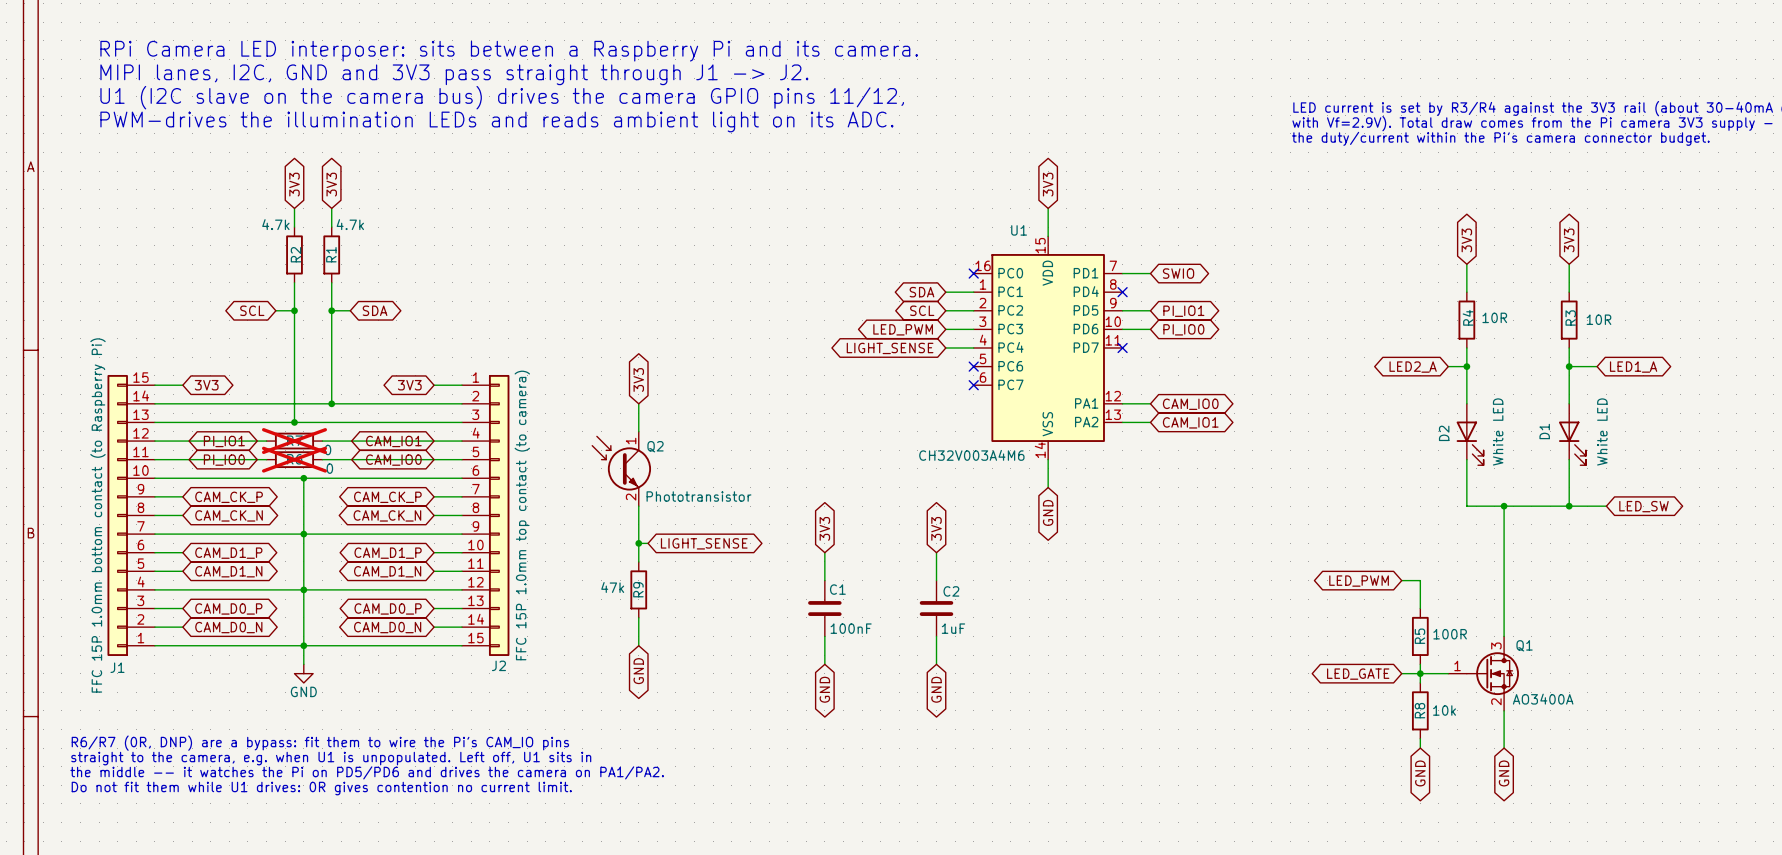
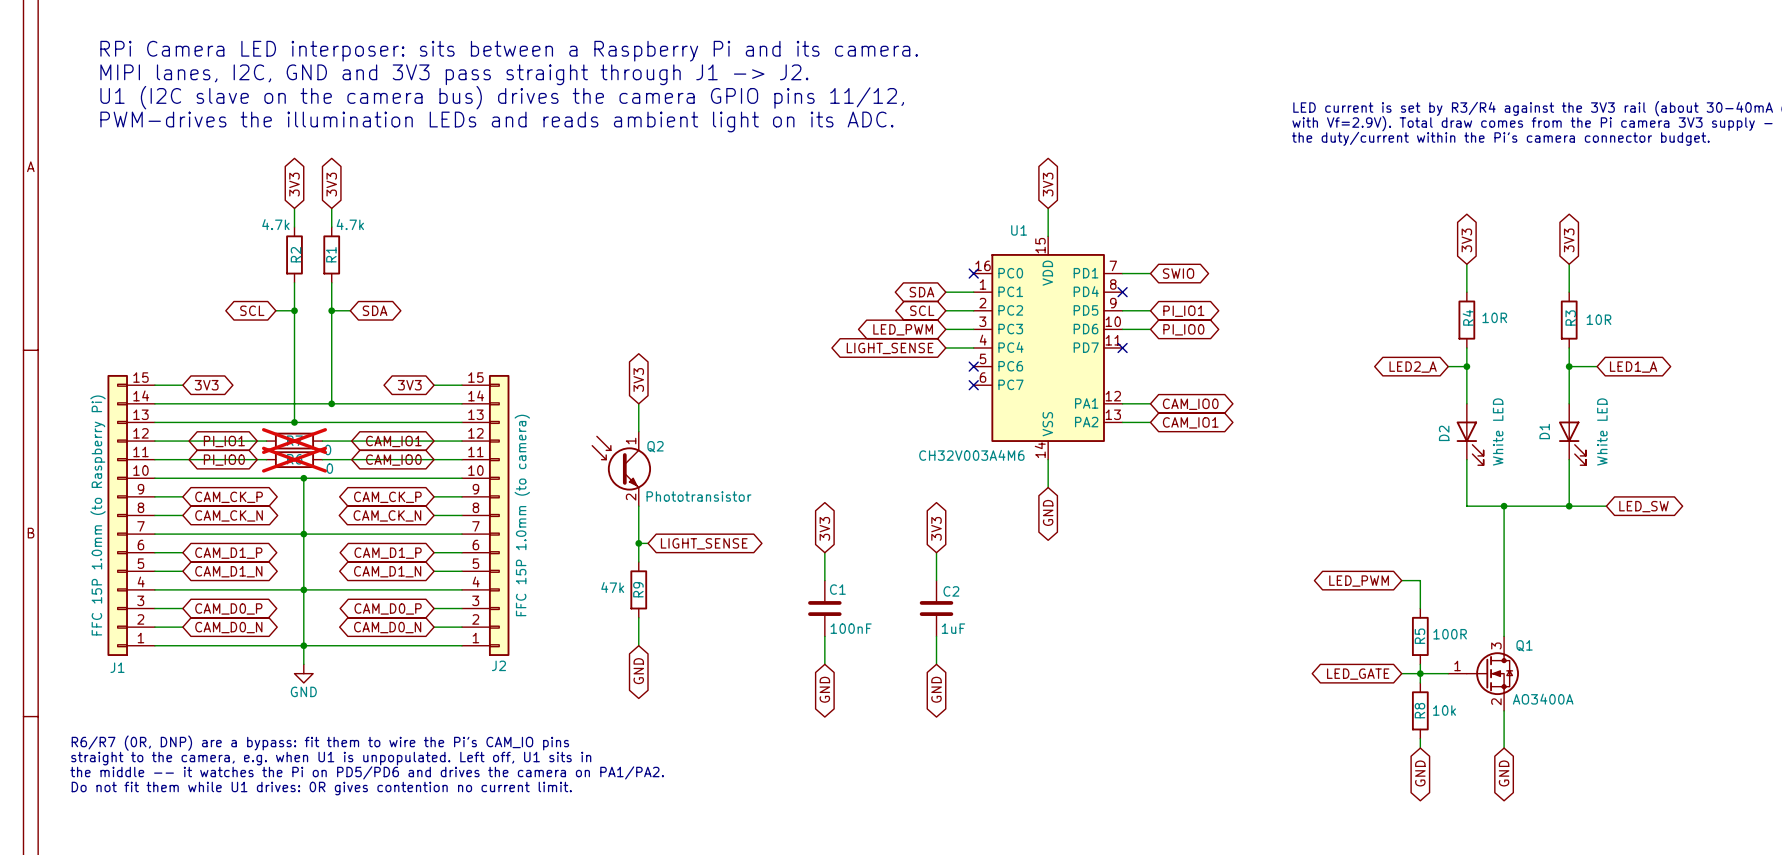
J1 value: FFC 15P 1.0mm bottom contact (to Raspberry Pi) (98, 515) -> FFC 15P 1.0mm (to Raspberry Pi) (98, 515)
J2 flip: as is (499, 515) -> up-down (499, 515)
J2 value: FFC 15P 1.0mm top contact (to camera) (522, 515) -> FFC 15P 1.0mm (to camera) (522, 515)

